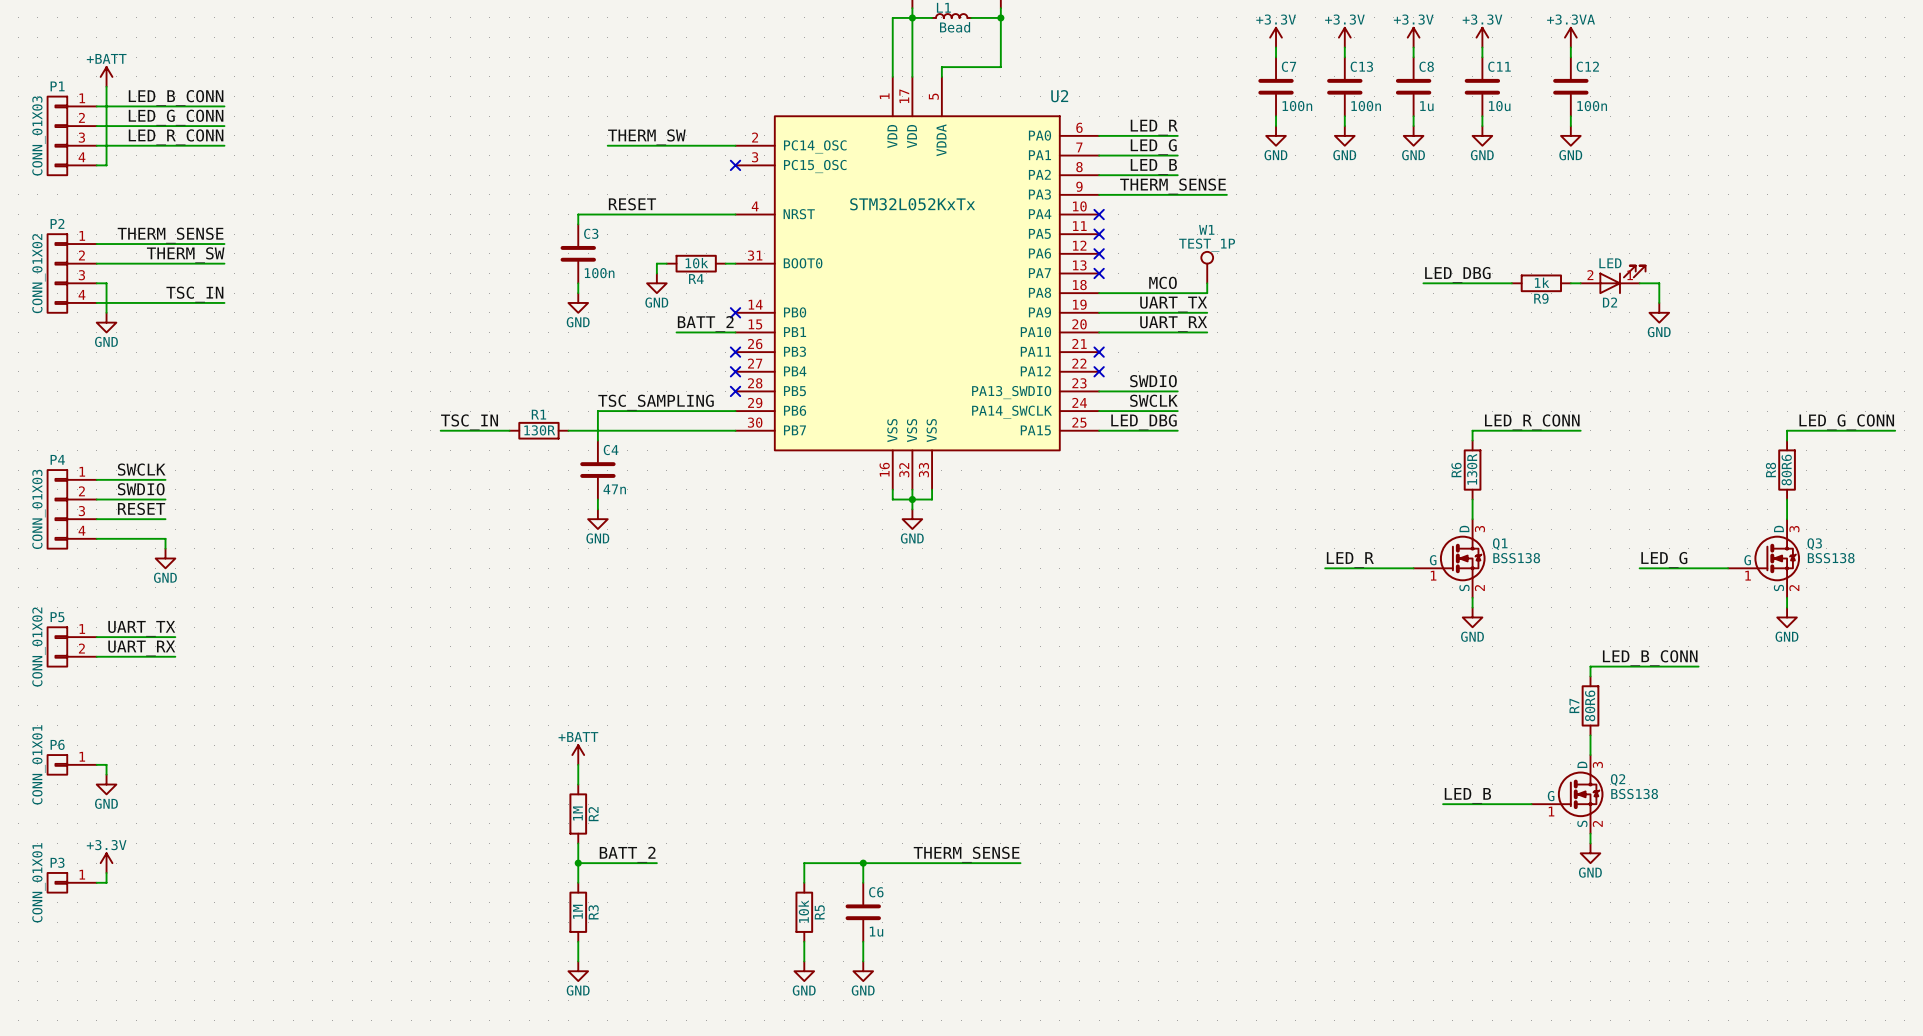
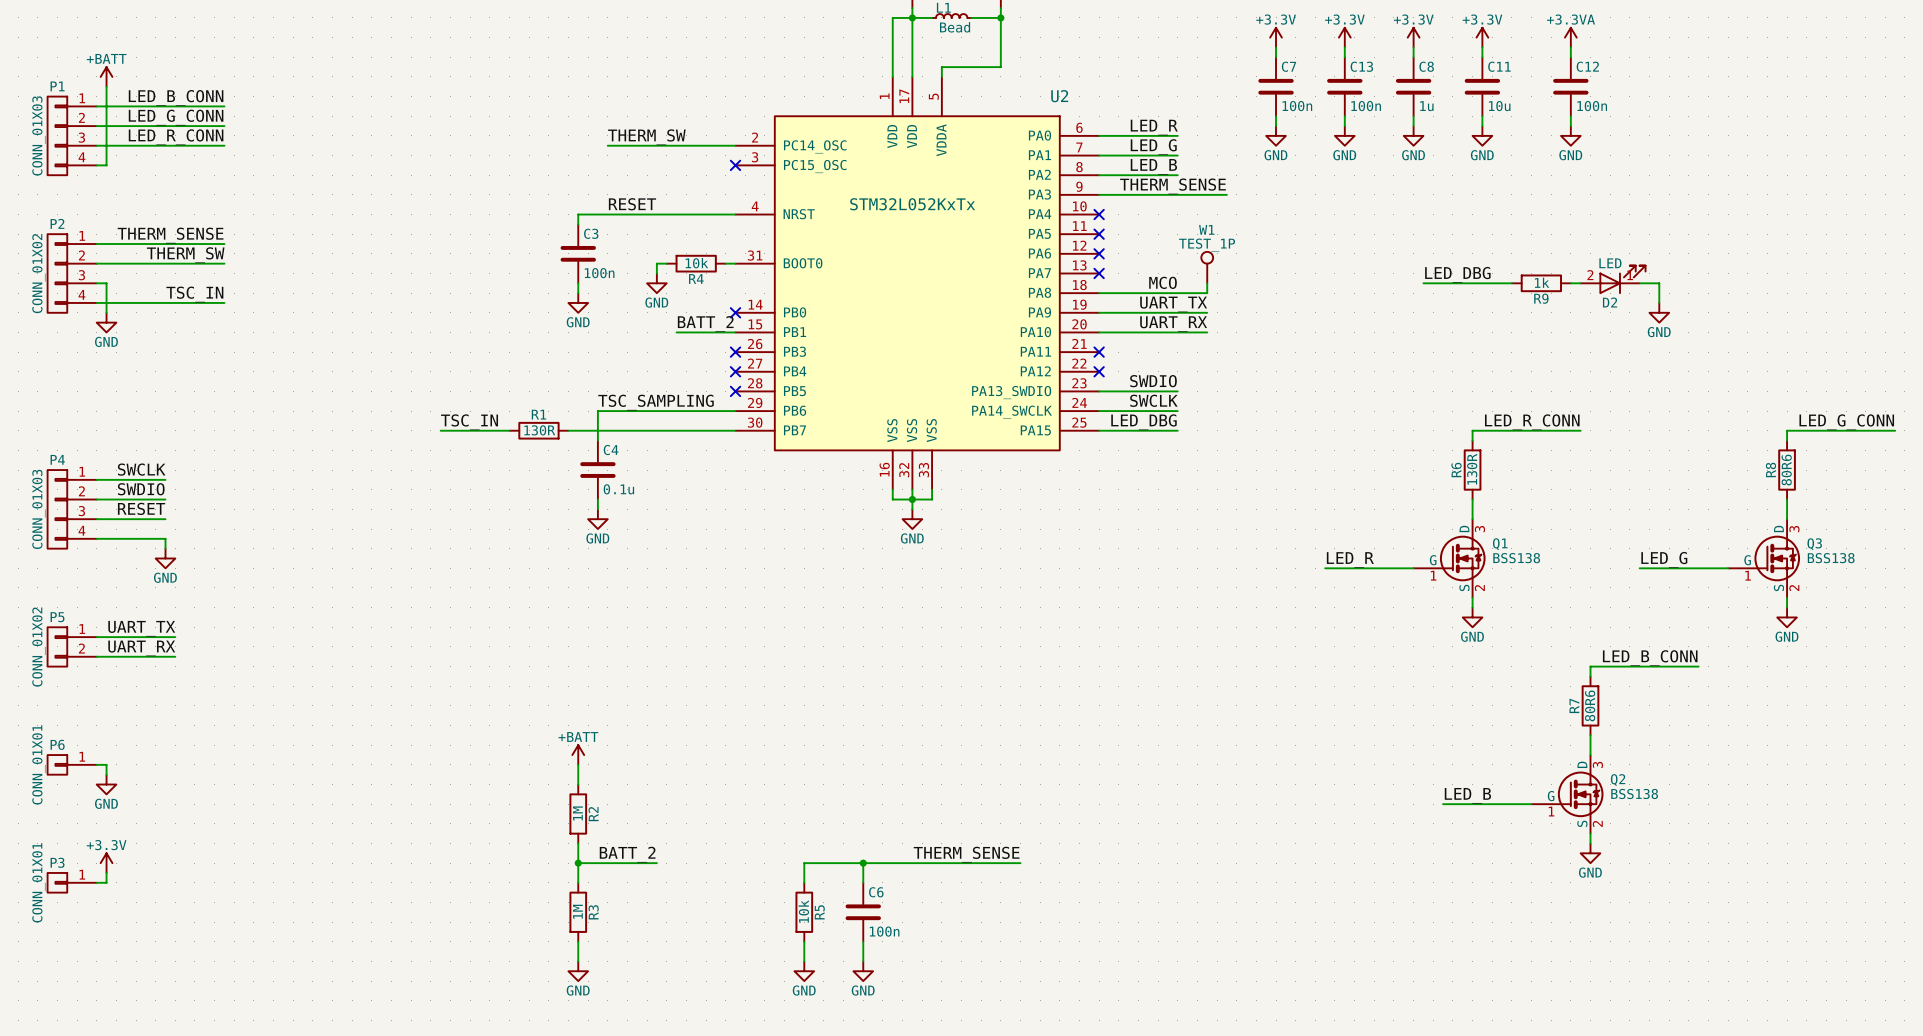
C4 value: 47n (614, 489) -> 0.1u (618, 489)
C6 value: 1u (876, 931) -> 100n (884, 931)

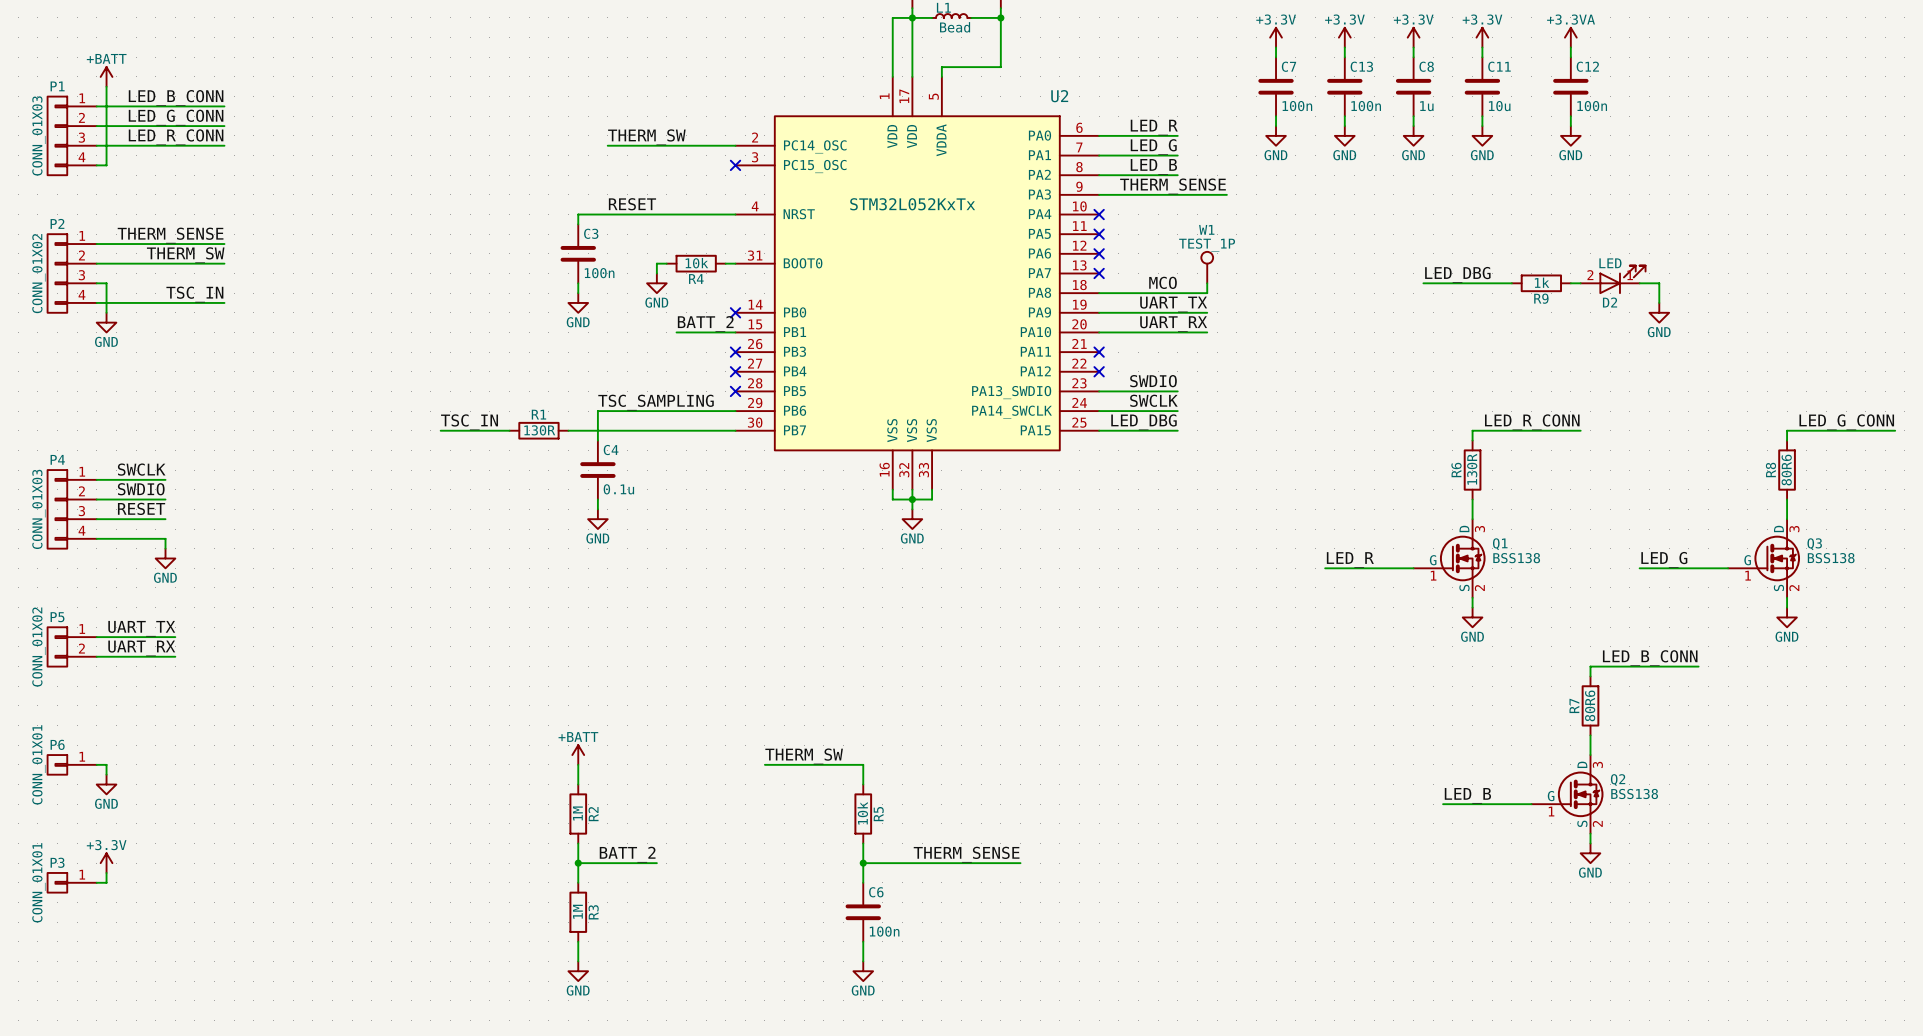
label: none -> THERM_SW (804, 756)
wire: none -> (764, 764) (863, 764) (863, 784)
wire: (863, 863) (804, 863) (804, 882) -> (863, 863) (863, 843)
R5 position: (804, 912) -> (863, 814)
wire: (804, 941) (804, 961) -> none
power symbol: GND (804, 971) -> none

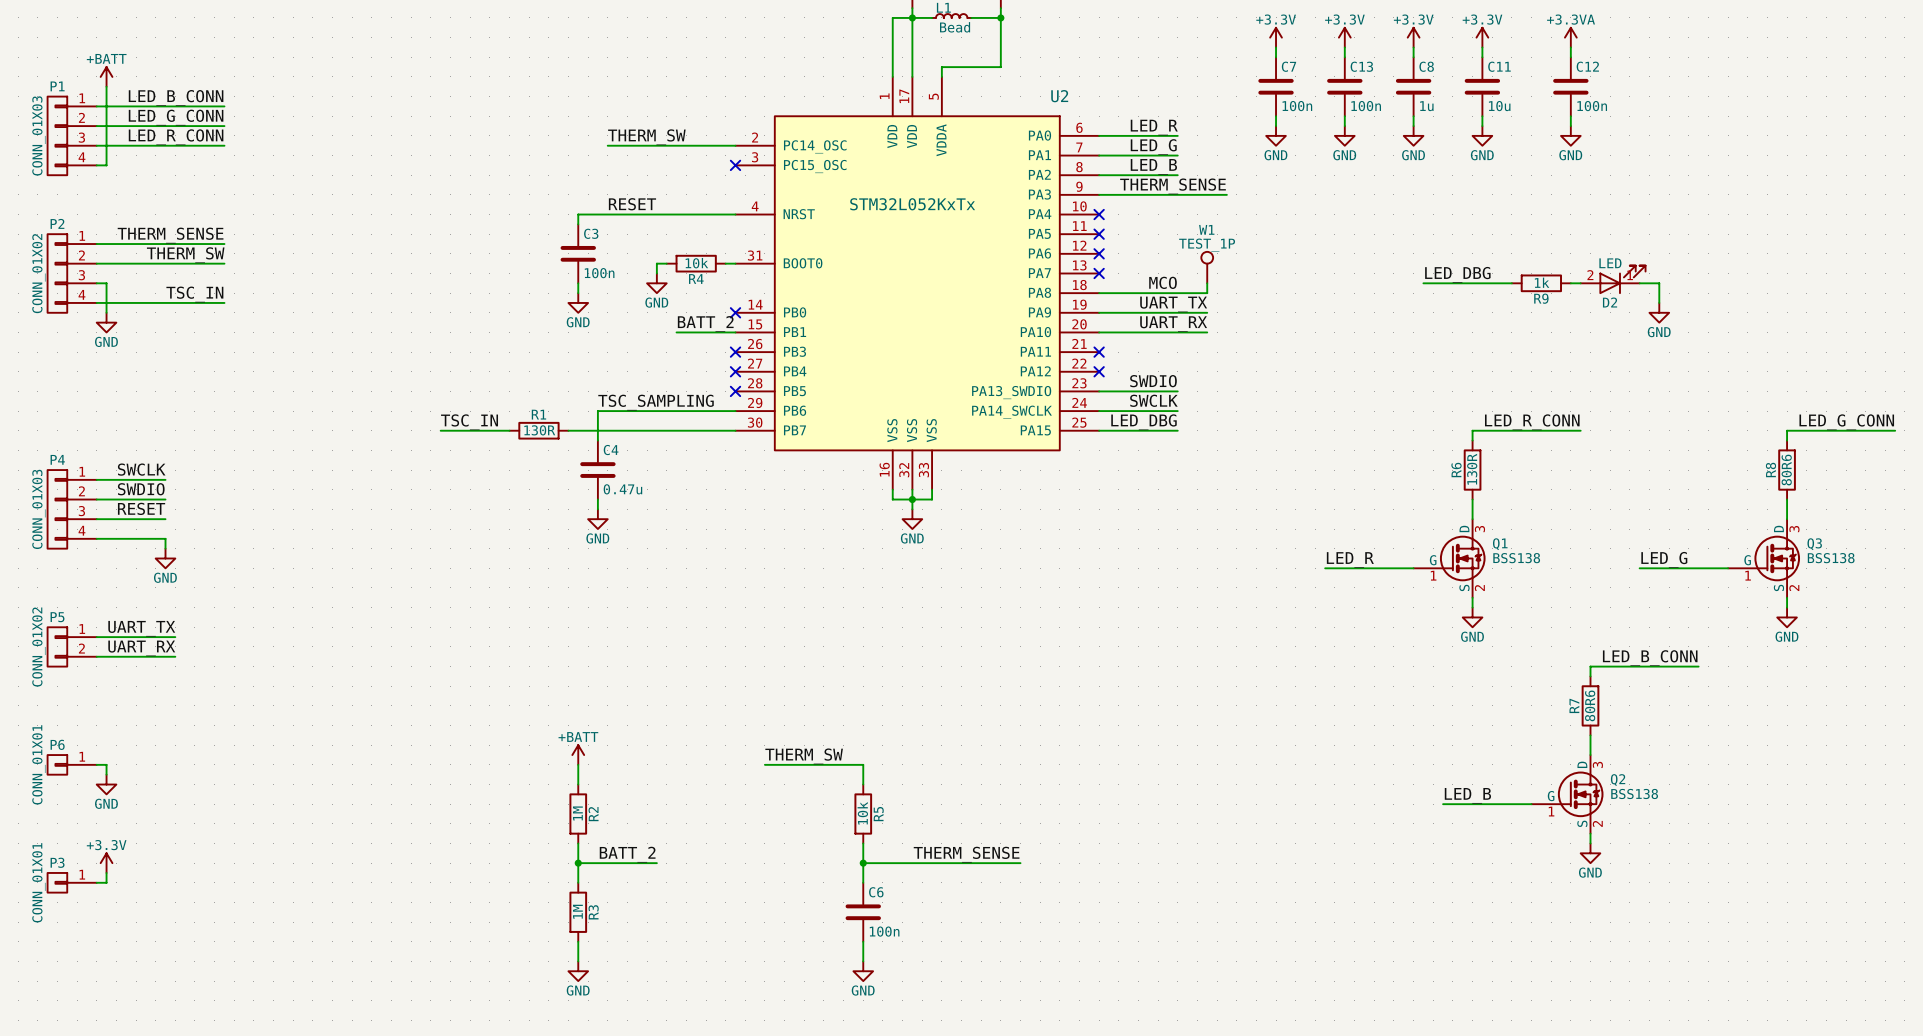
C4 value: 0.1u (618, 489) -> 0.47u (622, 489)

